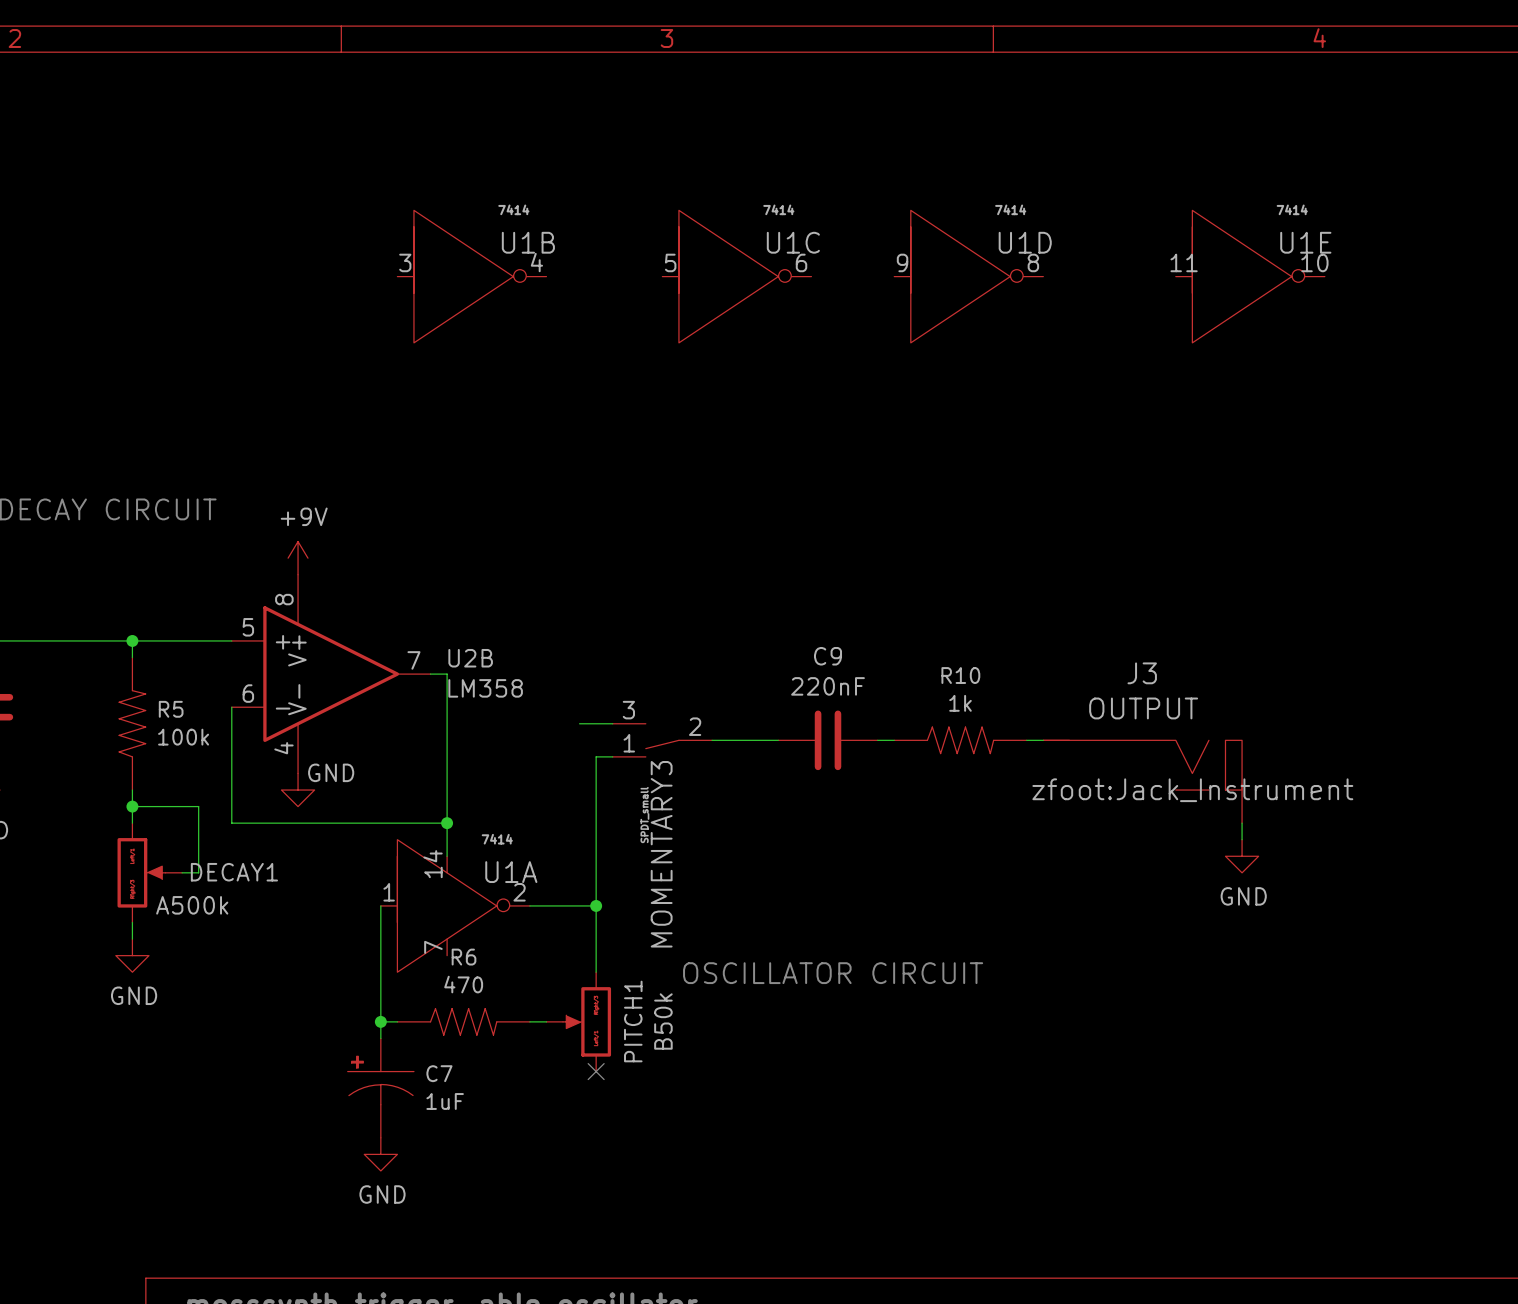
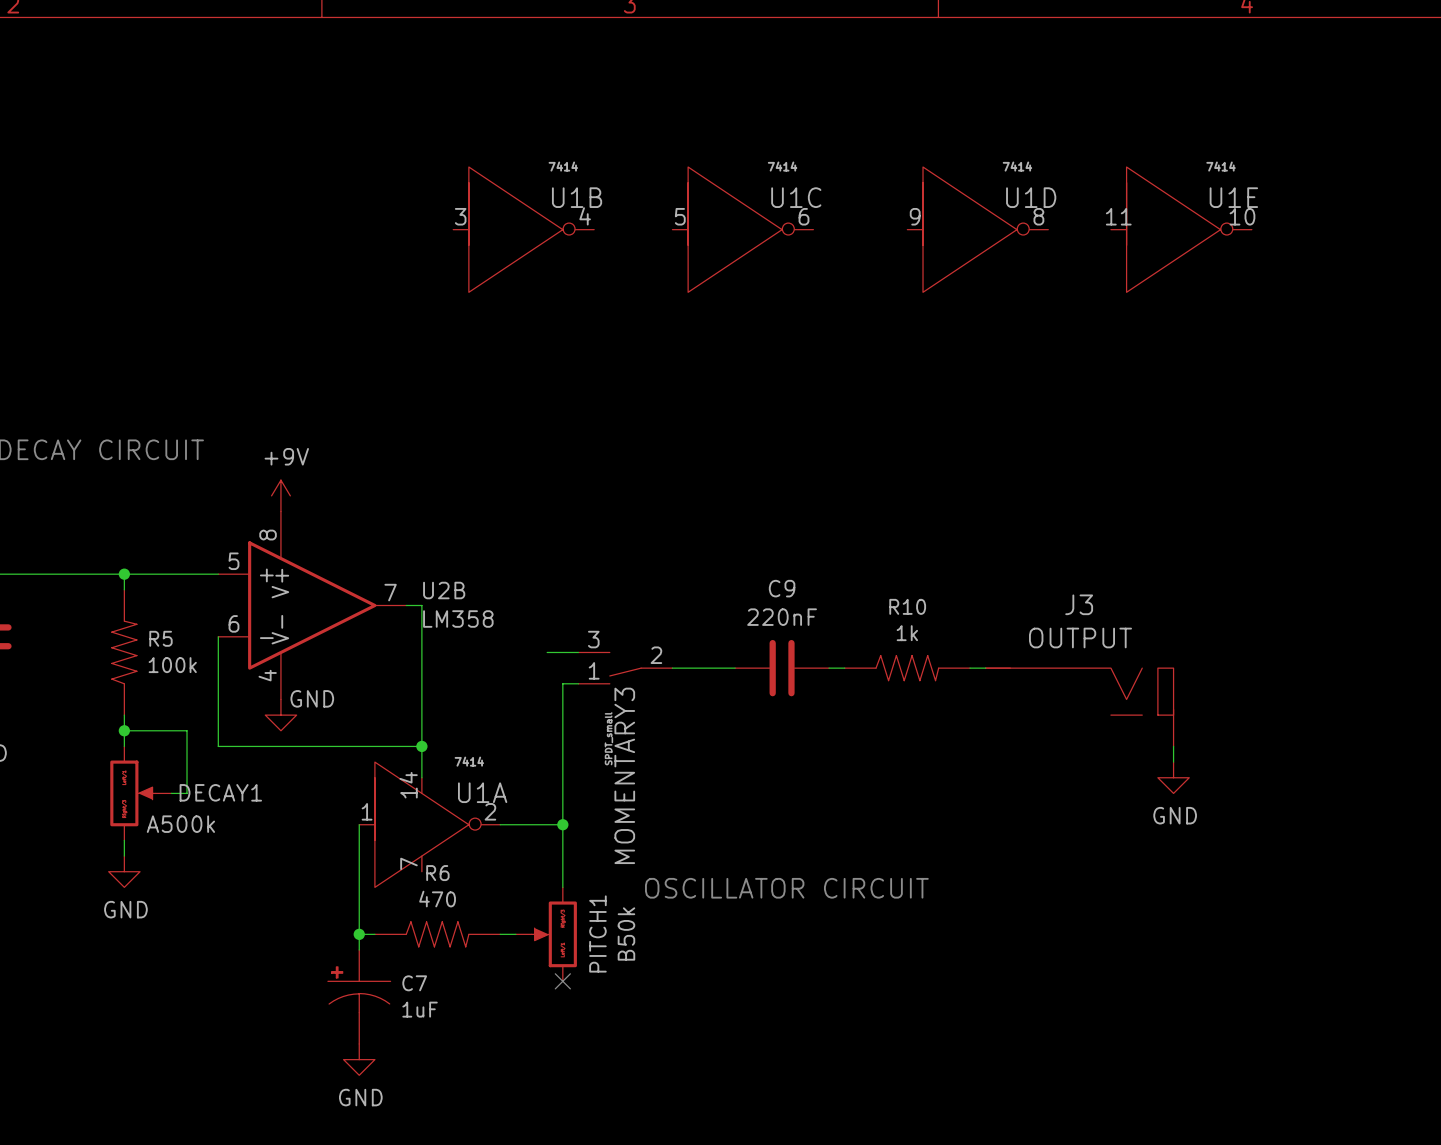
U1B position: (471, 276) -> (523, 229)
U1C position: (736, 276) -> (742, 229)
U1D position: (968, 276) -> (977, 229)
J3 text: zfoot:Jack_Instrument (1192, 790) -> none

